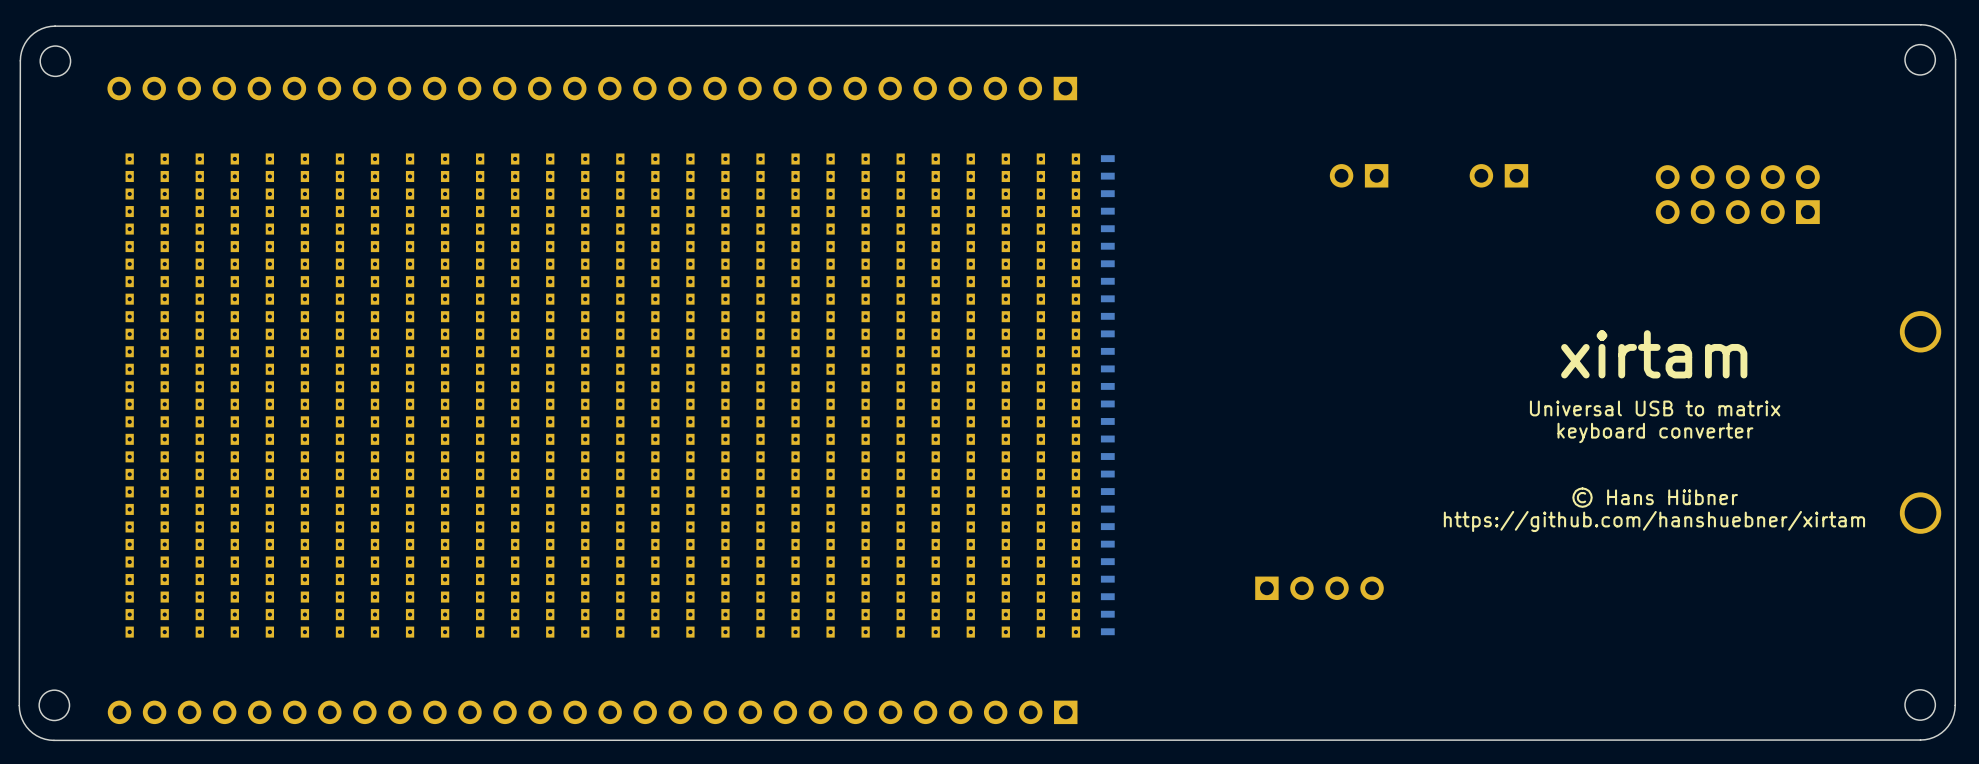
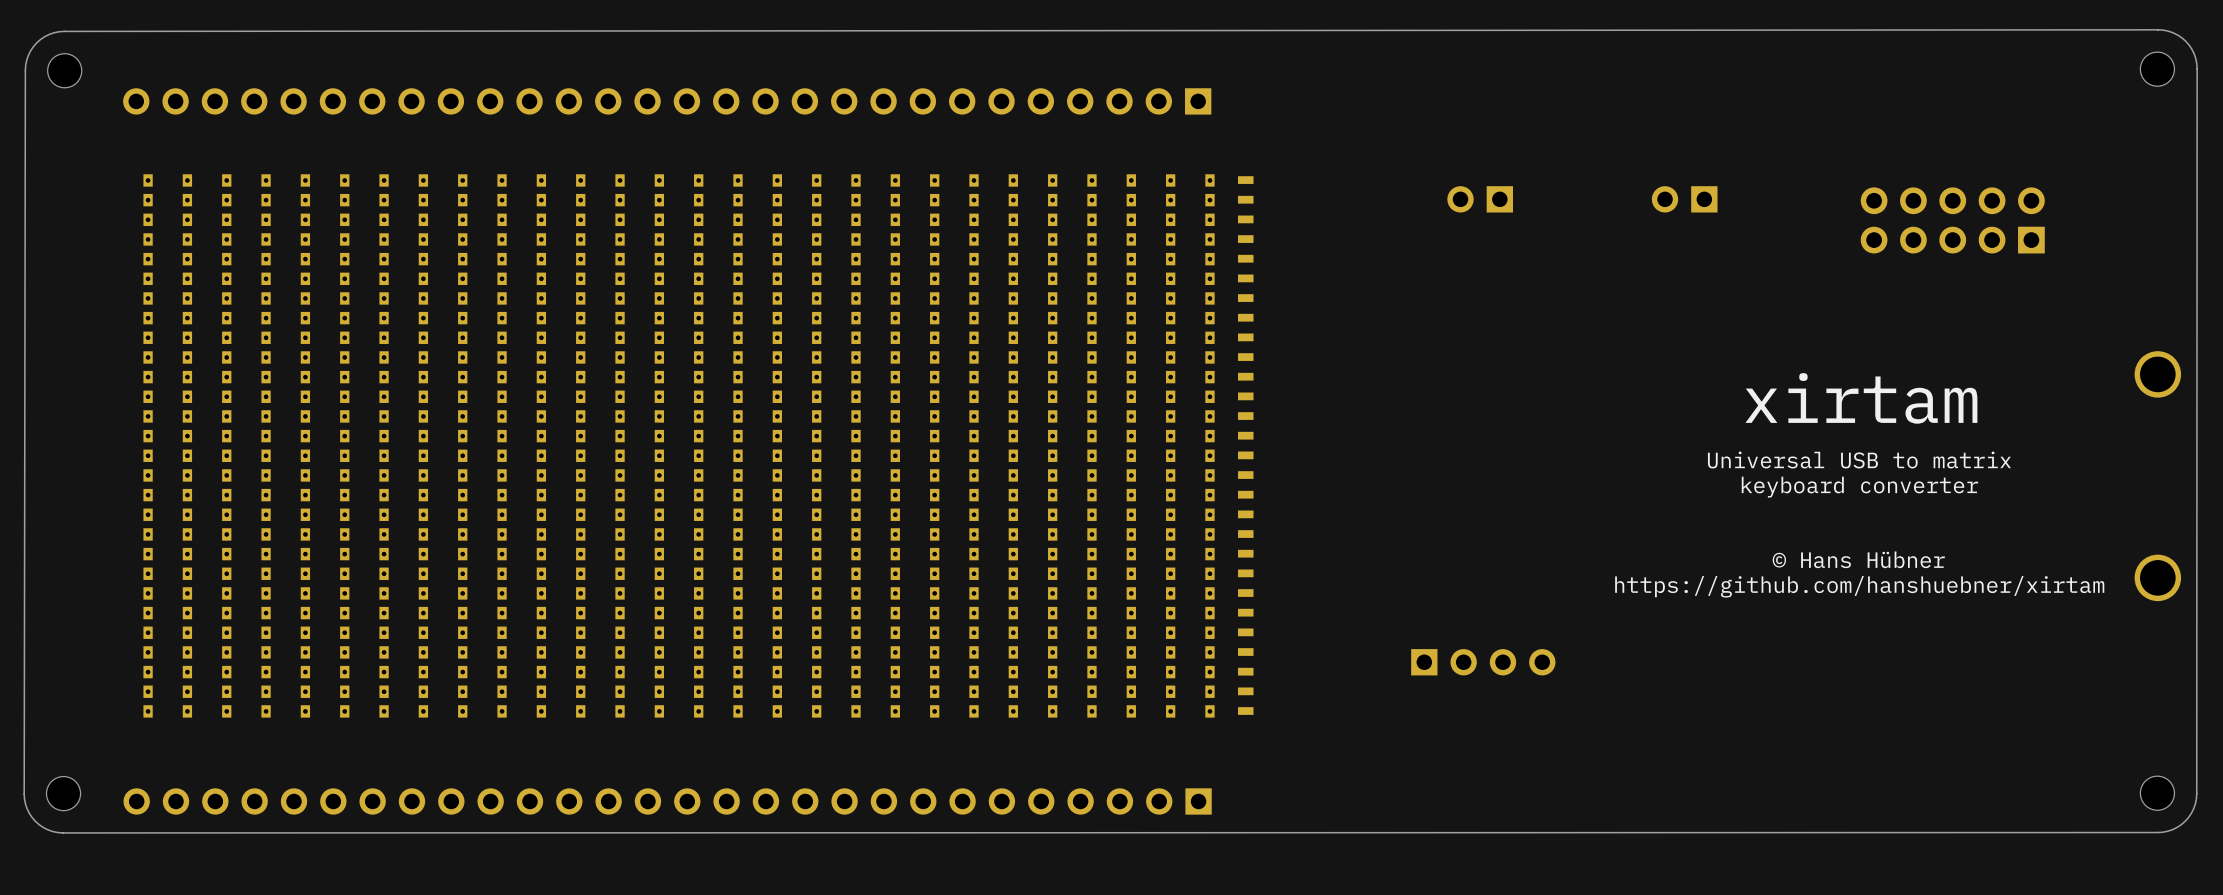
part position: (1359, 175) -> (1480, 199)

